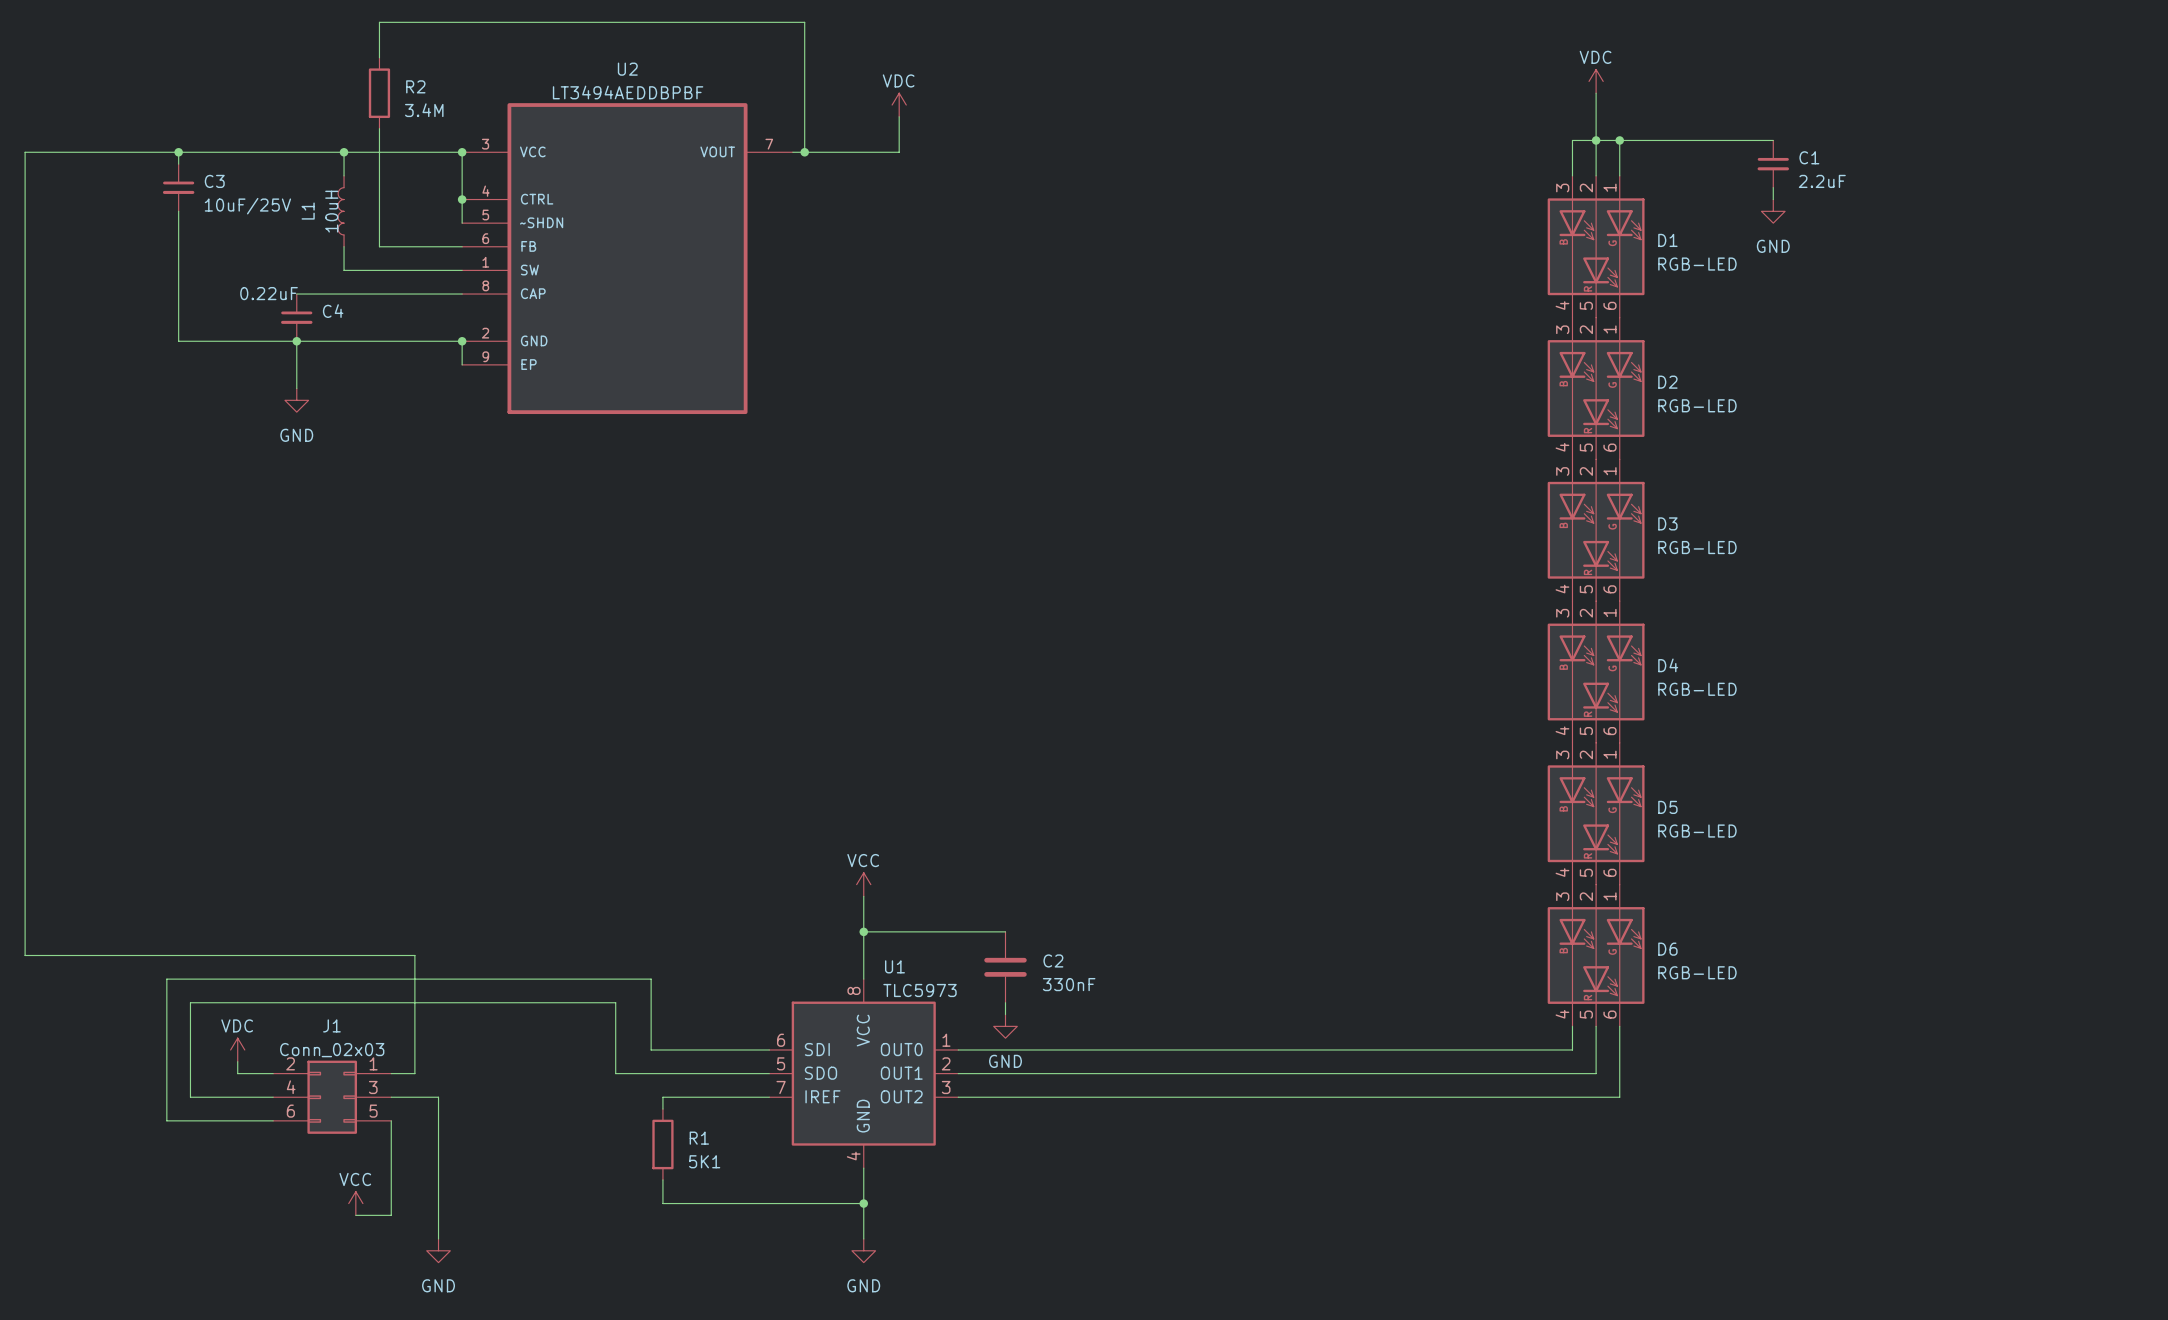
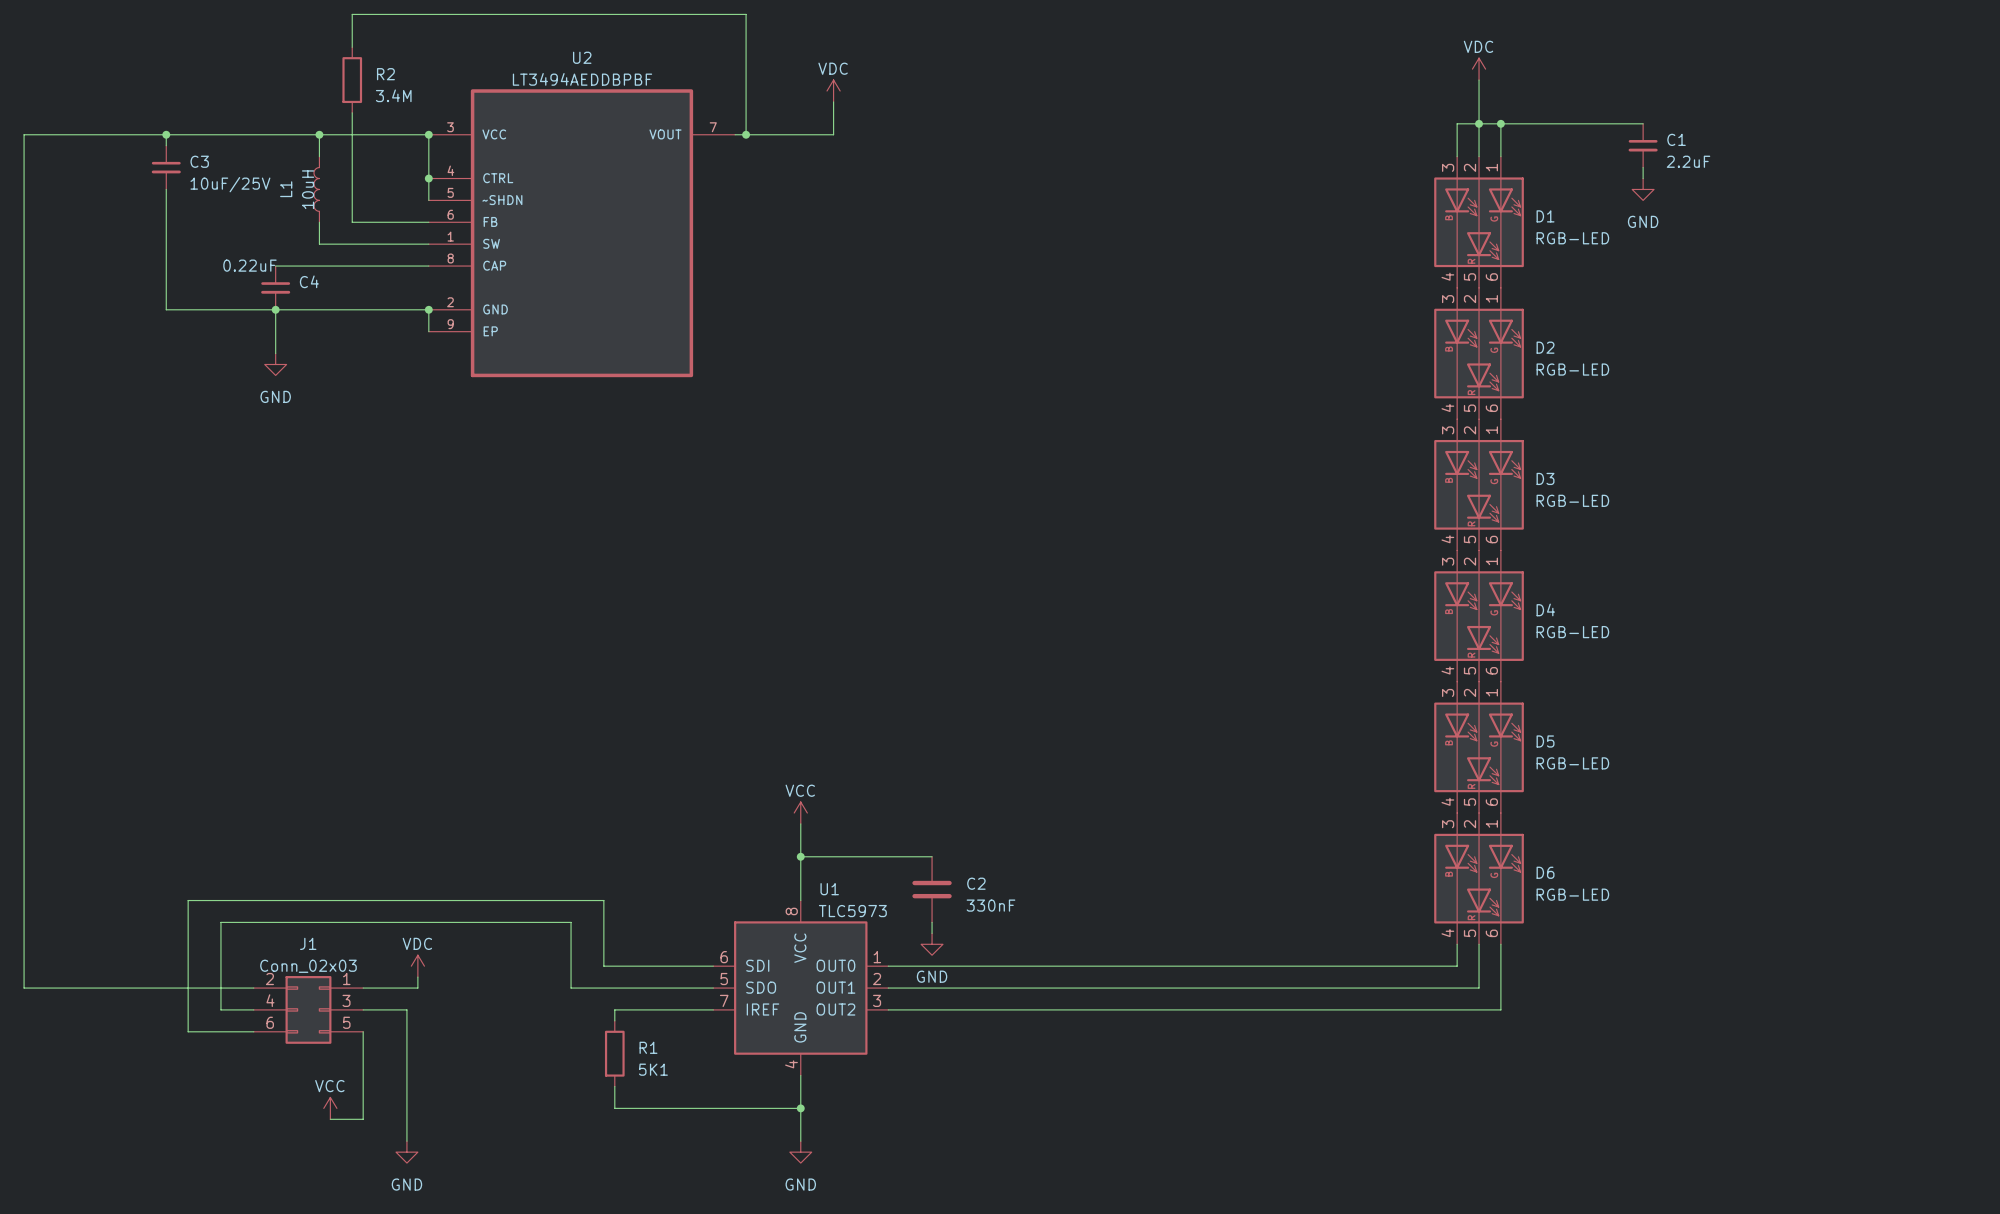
wire: (25, 955) (414, 955) (414, 1073) -> (24, 878) (24, 988) (220, 988) (220, 1009)
wire: (202, 979) (166, 979) (166, 1120) (202, 1120) -> (188, 900) (188, 1031)
wire: (237, 1002) (190, 1002) (190, 1097) (237, 1097) -> (220, 922) (220, 977)
power symbol position: VDC (237, 1049) -> VDC (417, 966)
wire: none -> (417, 977) (417, 988) (385, 988)

